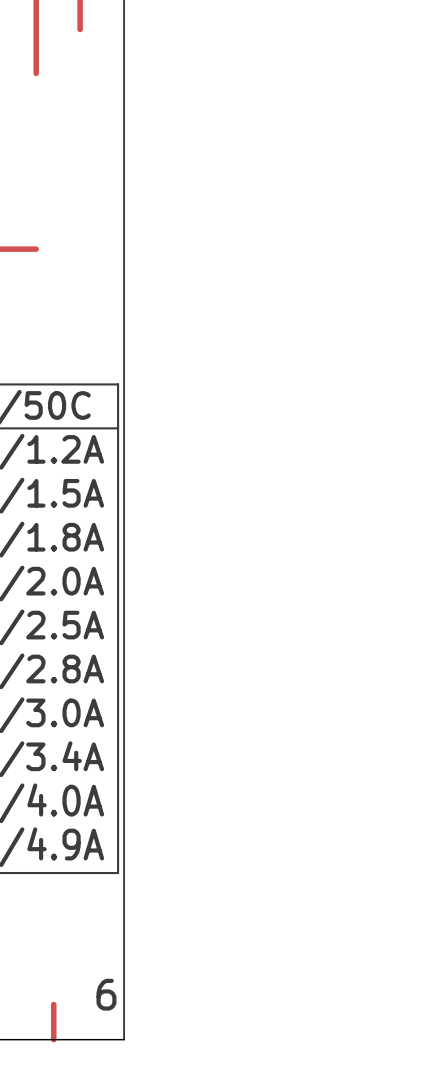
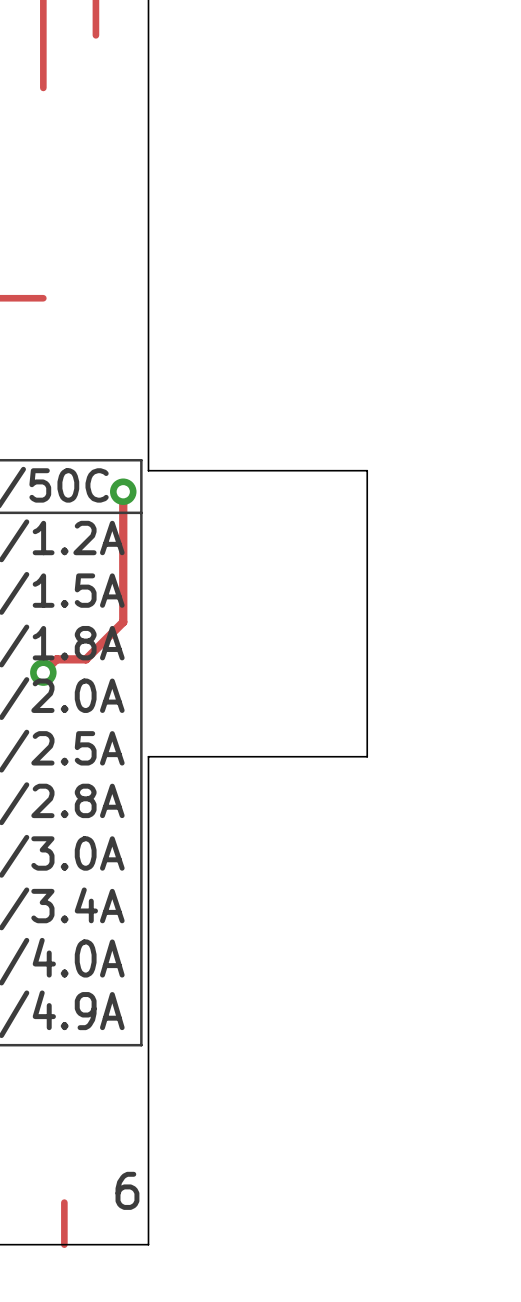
board edge: (124, 393) (124, 632) -> (148, 470) (367, 470) (367, 756) (148, 756)
track: none -> (123, 491) (123, 622) (86, 659) (56, 659) (43, 672)
via: none -> (123, 491)
via: none -> (43, 672)

